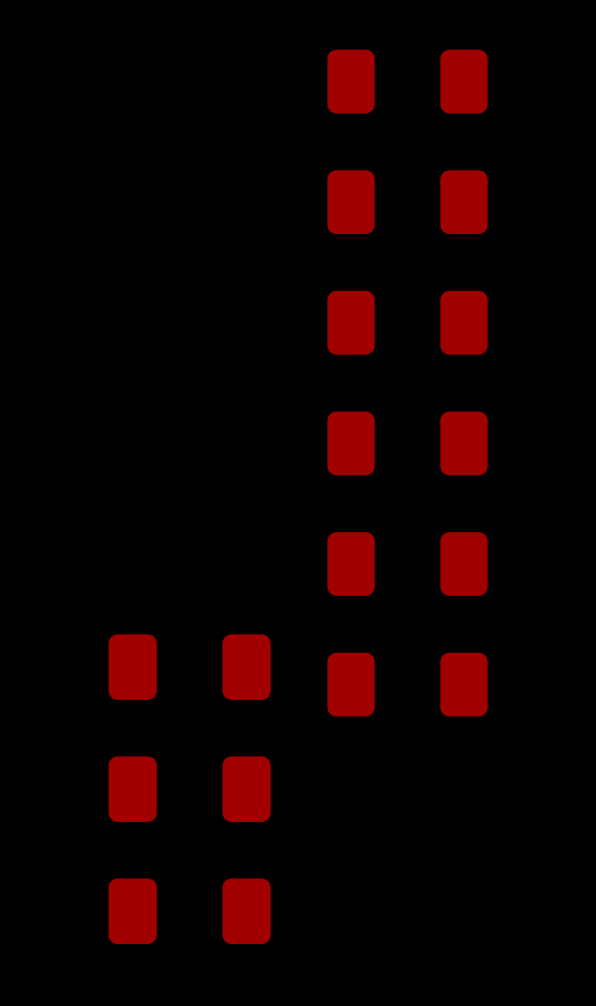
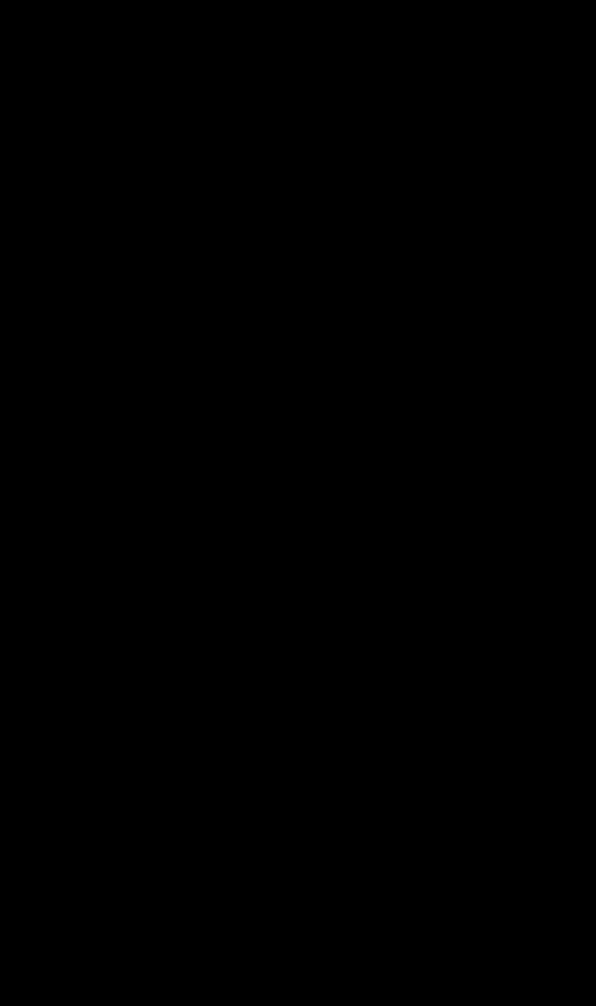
part: (407, 81) -> none
part: (407, 202) -> none
part: (407, 322) -> none
part: (407, 443) -> none
part: (407, 563) -> none
part: (189, 667) -> none
part: (407, 684) -> none
part: (189, 789) -> none
part: (189, 911) -> none

